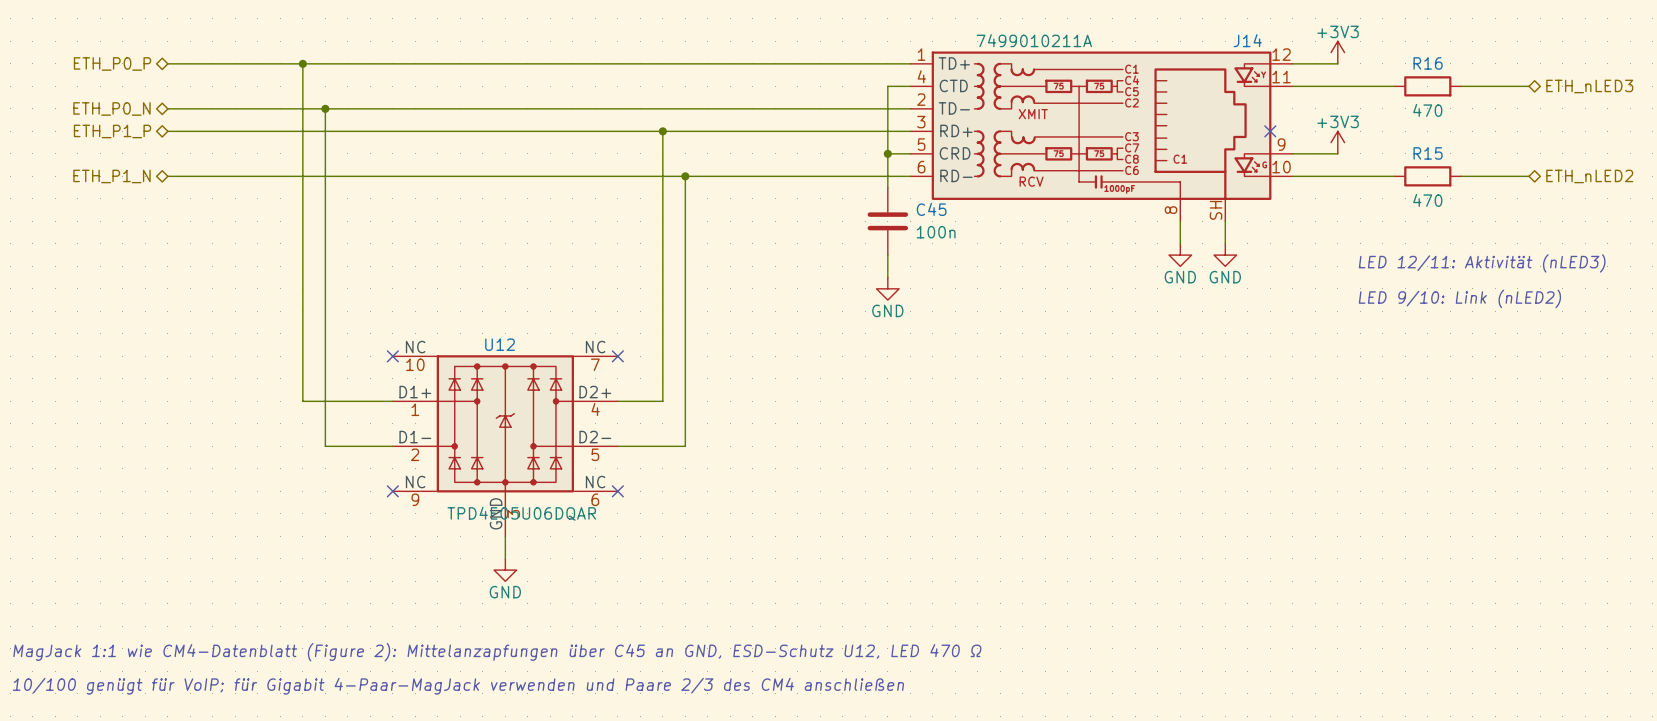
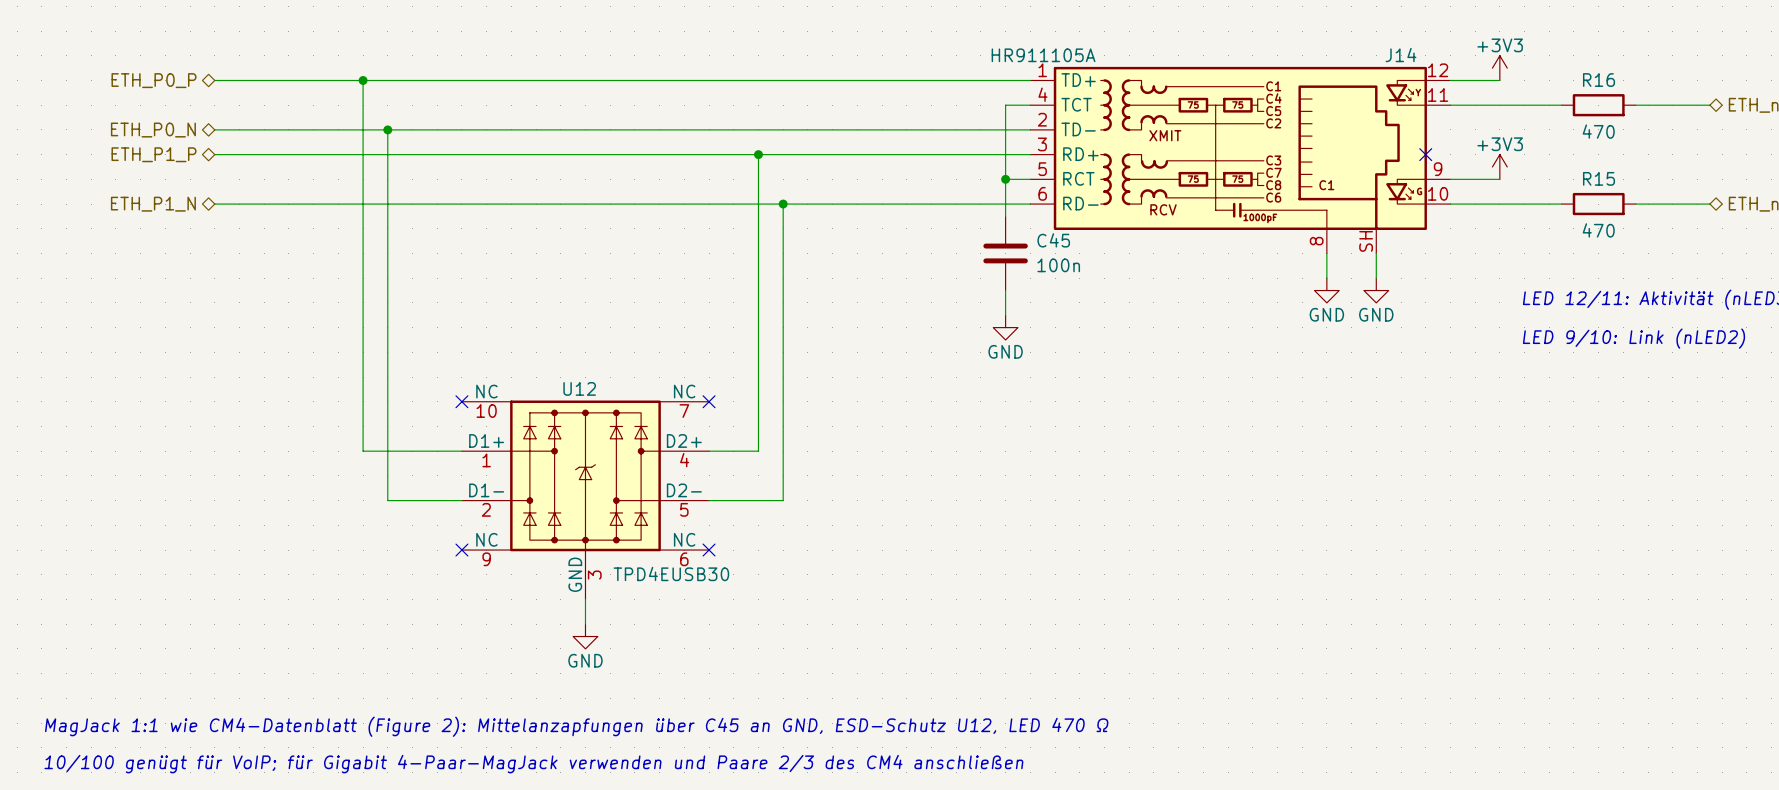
J14 value: 7499010211A (1034, 40) -> HR911105A (1043, 55)
J14 pin name: CTD (953, 85) -> TCT (1076, 104)
J14 pin name: CRD (955, 153) -> RCT (1078, 178)
U12 value: TPD4E05U06DQAR (521, 513) -> TPD4EUSB30 (671, 573)

